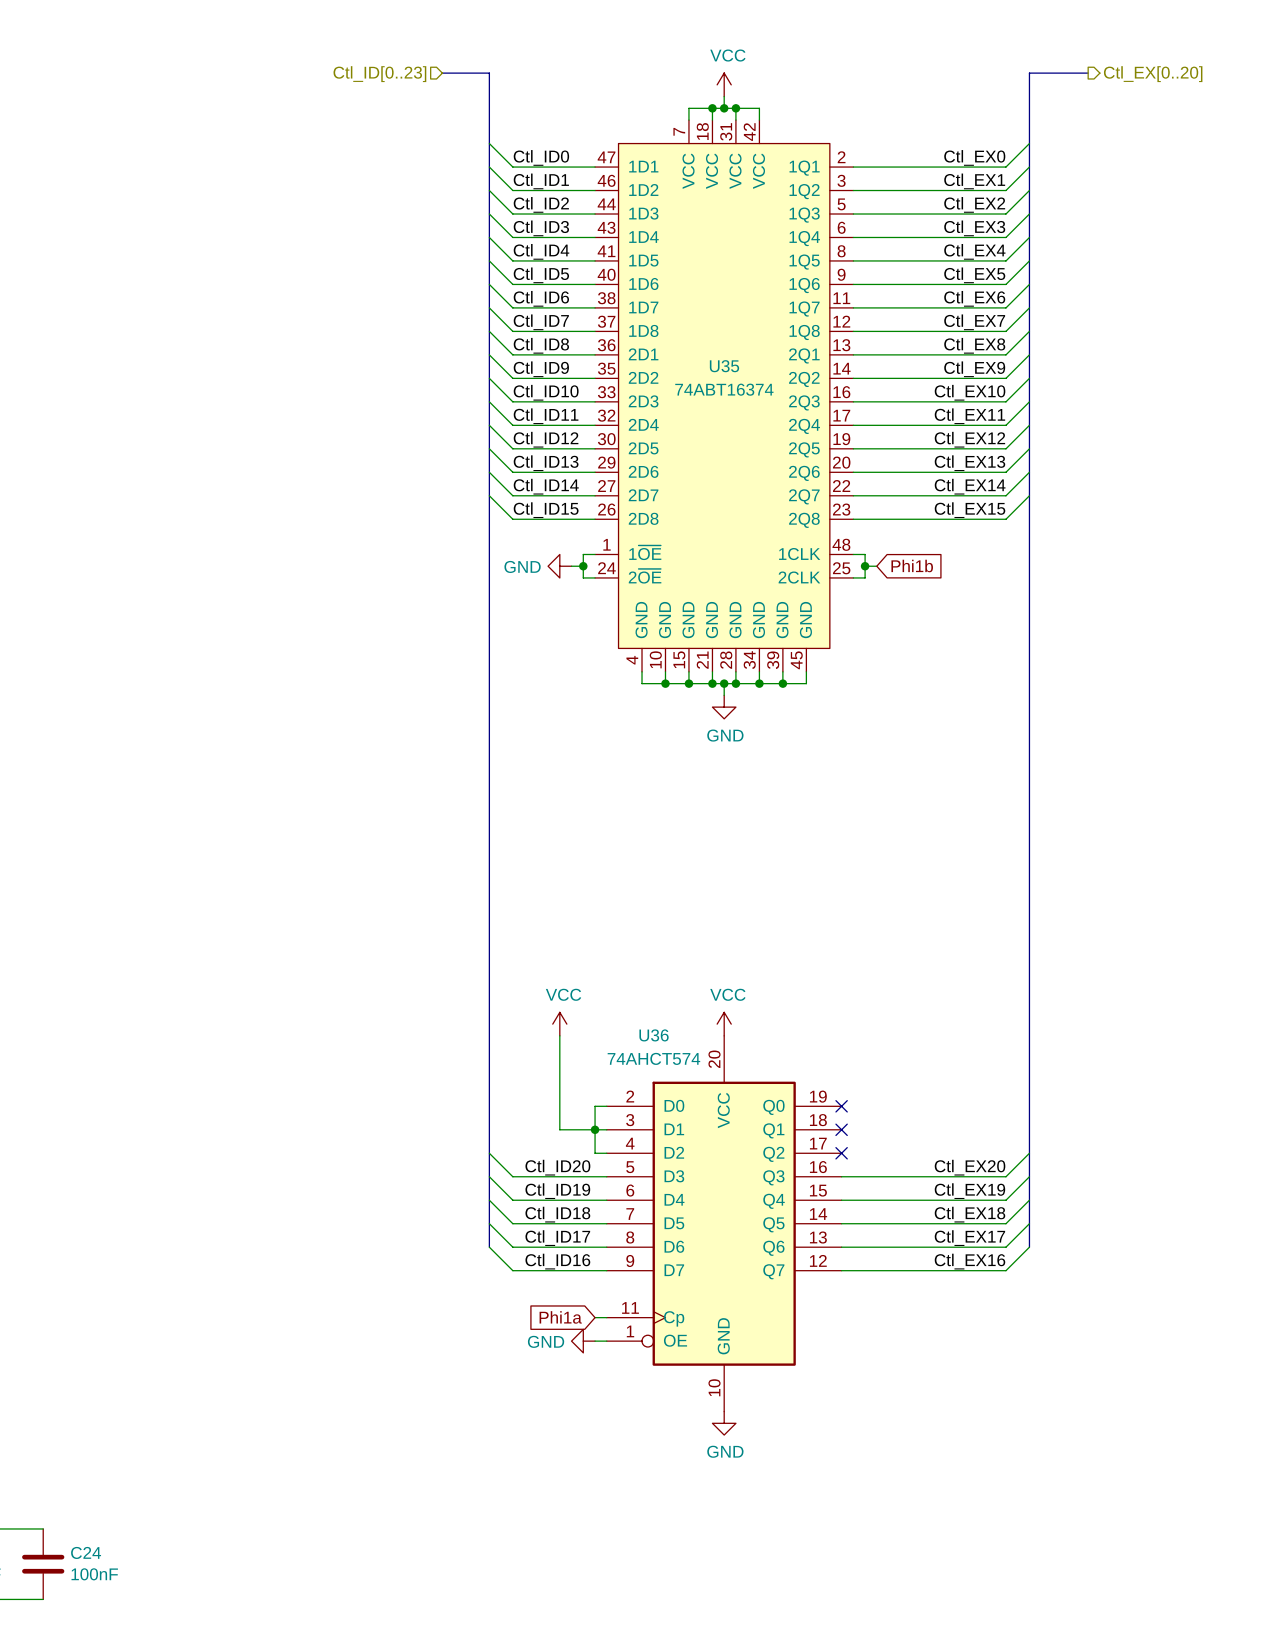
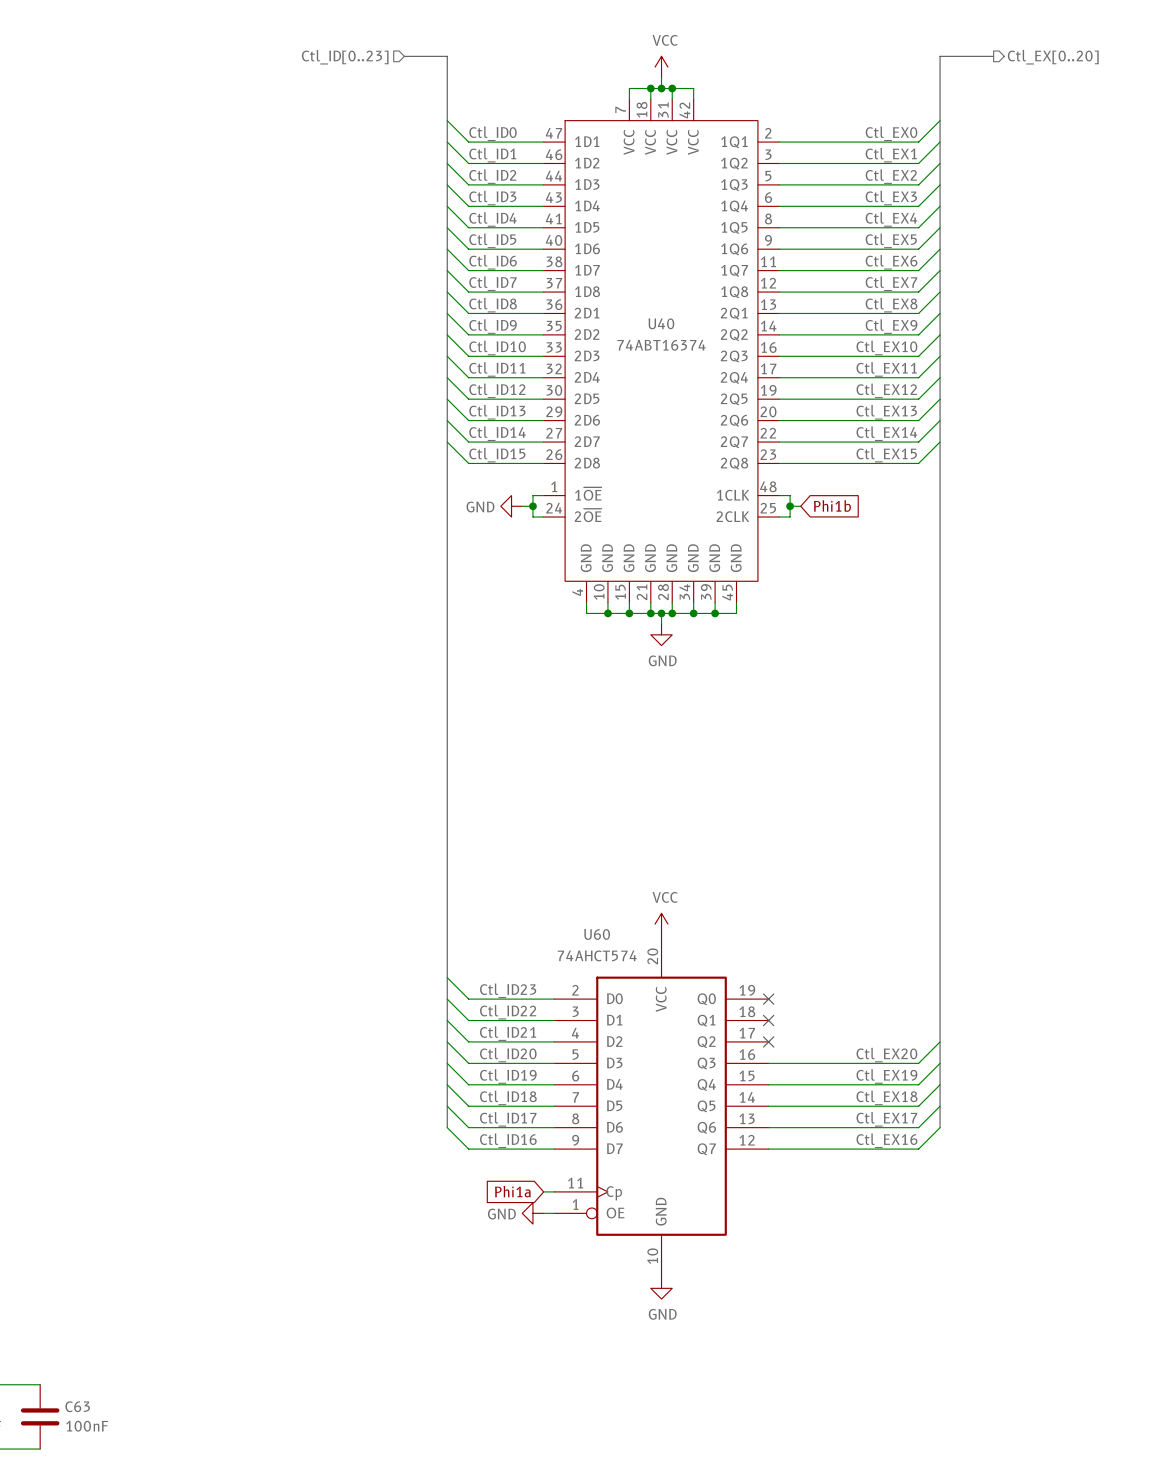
U35 name: U35 (724, 366) -> U40 (661, 323)
power symbol: VCC (559, 1024) -> none
wire: (559, 1035) (559, 1129) -> (447, 999) (468, 1020) (511, 1020)
U36 name: U36 (654, 1035) -> U60 (597, 934)
wire: none -> (447, 977) (468, 999) (543, 999)
label: none -> Ctl_ID23 (508, 990)
wire: (595, 1106) (595, 1153) -> (447, 1020) (468, 1041) (543, 1041)
label: none -> Ctl_ID22 (508, 1012)
junction: (595, 1129) -> none
label: none -> Ctl_ID21 (508, 1033)
C24 name: C24 (86, 1552) -> C63 (77, 1406)

